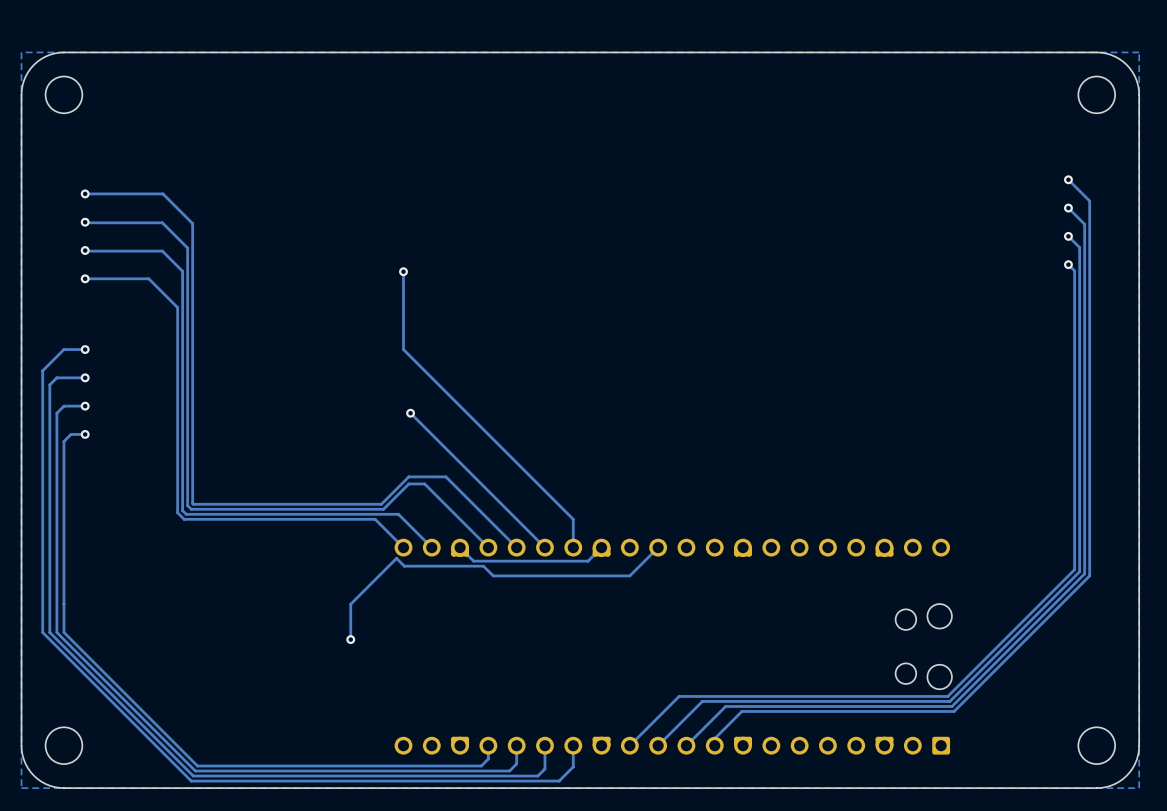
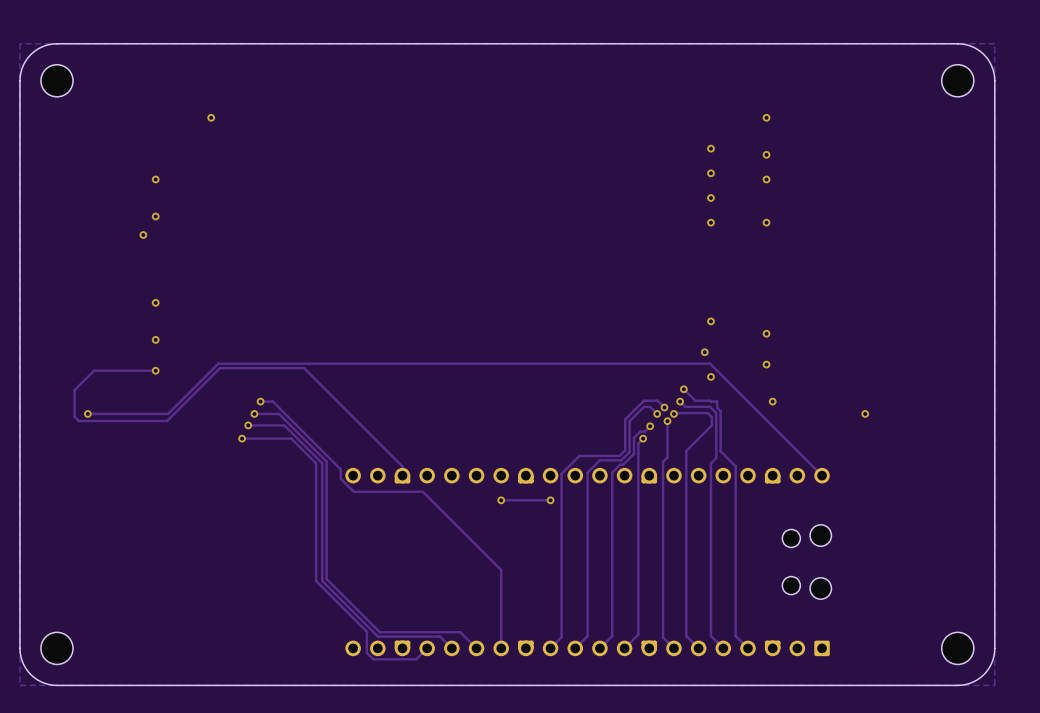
via: none -> (211, 117)
via: none -> (766, 117)
via: none -> (710, 148)
via: none -> (766, 154)
track: (1068, 179) (1089, 200) (1089, 575) (954, 711) (741, 711) (714, 738) (714, 745) -> (643, 438) (638, 443) (638, 634) (624, 648)
via: (1068, 179) -> none
track: (85, 193) (162, 193) (192, 223) (193, 504) (381, 504) (408, 476) (445, 476) (516, 547) -> none
via: (85, 193) -> none
via: none -> (710, 173)
via: none -> (155, 179)
via: none -> (766, 179)
track: (1068, 208) (1084, 224) (1084, 573) (952, 706) (725, 706) (700, 731) -> (650, 426) (633, 437) (633, 453) (612, 472) (612, 636)
via: (1068, 208) -> none
track: (85, 222) (162, 222) (187, 248) (187, 505) (191, 509) (383, 509) (408, 483) (424, 483) (488, 547) -> none
via: (85, 222) -> none
via: none -> (710, 198)
track: (1068, 236) (1079, 247) (1079, 571) (949, 701) (702, 701) (672, 731) -> (657, 413) (650, 406) (643, 406) (629, 421) (629, 452) (621, 460) (599, 460) (587, 472) (587, 636)
via: (1068, 236) -> none
track: (85, 250) (162, 251) (182, 271) (182, 510) (186, 514) (398, 514) (431, 547) -> none
via: (85, 250) -> none
via: none -> (155, 216)
via: none -> (710, 222)
via: none -> (766, 222)
track: (1068, 264) (1074, 270) (1074, 569) (947, 696) (679, 696) (642, 733) -> (664, 407) (657, 400) (643, 400) (625, 419) (625, 450) (619, 455) (579, 455) (561, 473) (561, 637)
via: (1068, 264) -> none
via: none -> (143, 235)
track: (403, 271) (403, 349) (573, 519) (573, 547) -> none
via: (403, 271) -> none
track: (85, 278) (148, 278) (177, 307) (177, 512) (184, 519) (375, 519) (403, 547) -> none
via: (85, 278) -> none
track: (85, 349) (63, 349) (42, 370) (42, 632) (191, 781) (559, 781) (573, 766) (573, 745) -> none
via: (85, 349) -> none
via: none -> (155, 302)
via: none -> (710, 321)
track: (85, 377) (56, 377) (49, 384) (49, 632) (193, 776) (537, 776) (544, 768) (544, 745) -> (254, 413) (279, 413) (326, 461) (326, 579) (379, 632) (460, 632) (476, 648)
via: (85, 377) -> none
via: none -> (766, 333)
via: none -> (155, 339)
track: (85, 406) (63, 406) (56, 413) (56, 632) (195, 771) (509, 771) (516, 763) (516, 745) -> (248, 425) (284, 425) (322, 463) (322, 580) (377, 636) (440, 636) (451, 648)
via: (85, 406) -> none
via: none -> (704, 352)
track: (410, 413) (544, 547) -> none
via: (410, 413) -> none
via: none -> (766, 364)
via: none -> (155, 370)
track: (85, 434) (71, 434) (63, 441) (64, 632) (197, 766) (481, 766) (488, 758) (488, 745) -> (242, 438) (291, 438) (316, 463) (316, 580) (366, 631) (366, 652) (373, 659) (416, 659) (427, 648)
via: (85, 434) -> none
via: none -> (710, 376)
track: none -> (683, 389) (695, 400) (717, 401) (717, 407) (720, 411) (720, 451) (735, 466) (735, 636) (748, 648)
via: none -> (683, 389)
via: none -> (260, 401)
track: none -> (680, 401) (685, 406) (710, 406) (716, 413) (716, 458) (710, 463) (710, 636) (723, 648)
via: none -> (680, 401)
via: none -> (772, 401)
via: none -> (664, 407)
track: none -> (87, 413) (168, 413) (218, 363) (710, 363) (822, 475)
via: none -> (87, 413)
via: none -> (254, 413)
via: none -> (657, 413)
track: none -> (673, 413) (707, 413) (711, 417) (711, 425) (686, 450) (686, 636) (698, 648)
via: none -> (673, 413)
via: none -> (865, 413)
track: none -> (667, 421) (667, 457) (663, 461) (663, 637) (673, 648)
via: none -> (667, 421)
via: none -> (248, 425)
via: none -> (650, 426)
via: none -> (242, 438)
via: none -> (643, 438)
track: (601, 547) (588, 561) (473, 561) (460, 547) -> (155, 370) (94, 370) (74, 390) (74, 416) (78, 420) (167, 420) (220, 368) (304, 368) (402, 466) (402, 475)
track: (658, 547) (629, 575) -> none
track: (396, 558) (350, 604) (350, 639) -> (347, 485) (340, 478) (340, 469) (272, 401) (260, 401)
track: (573, 575) (493, 575) -> (501, 648) (501, 570) (431, 500)
via: none -> (501, 500)
via: none -> (550, 500)
via: (350, 639) -> none

